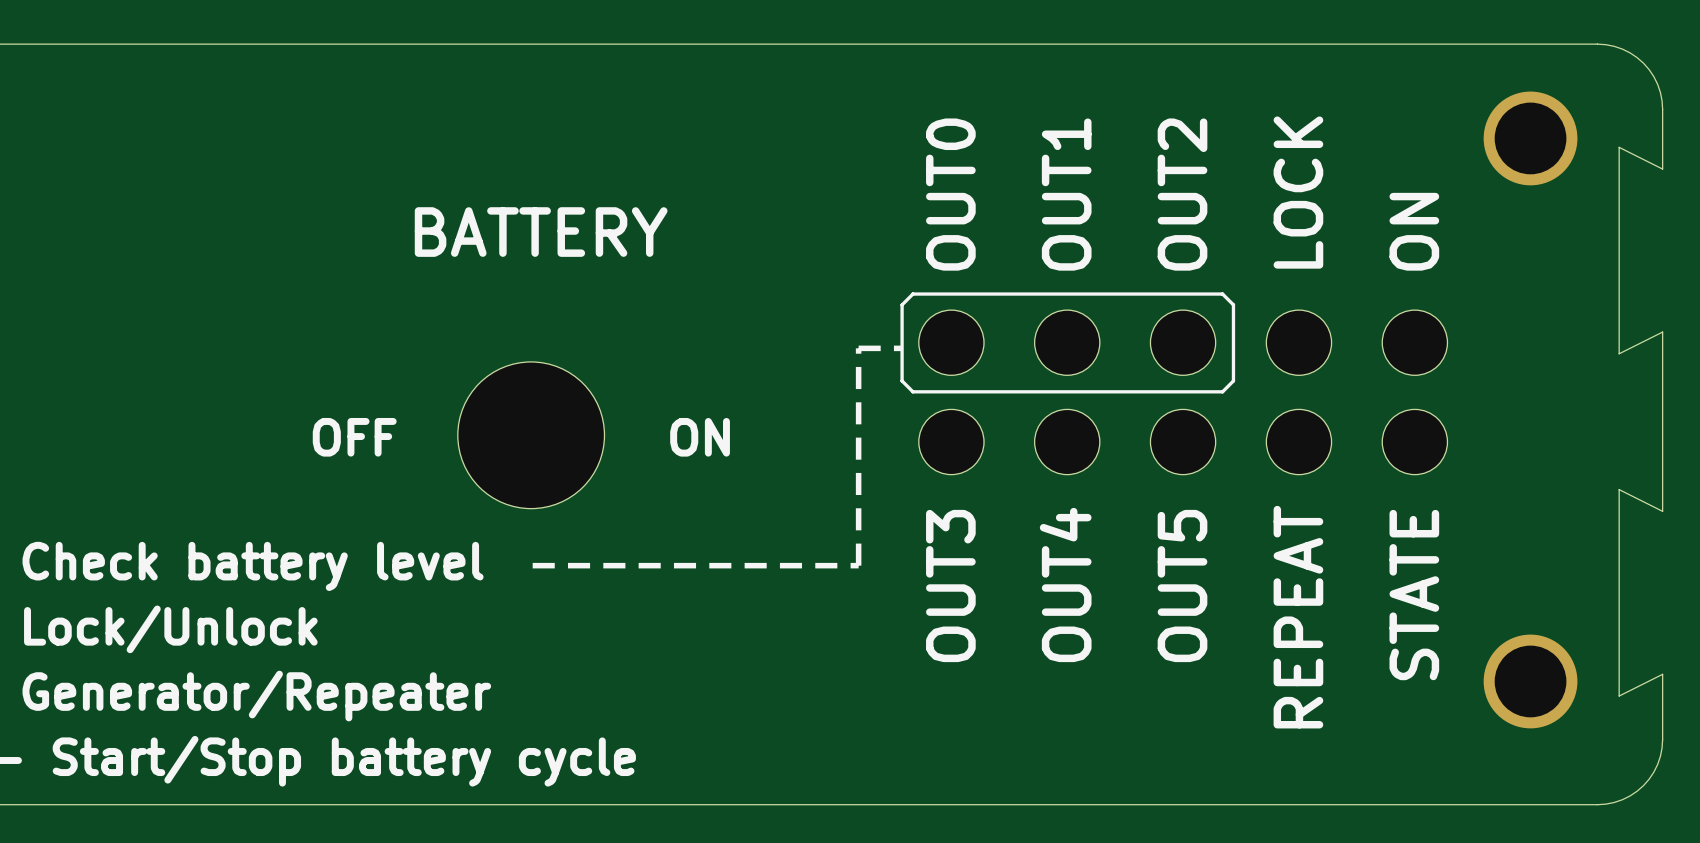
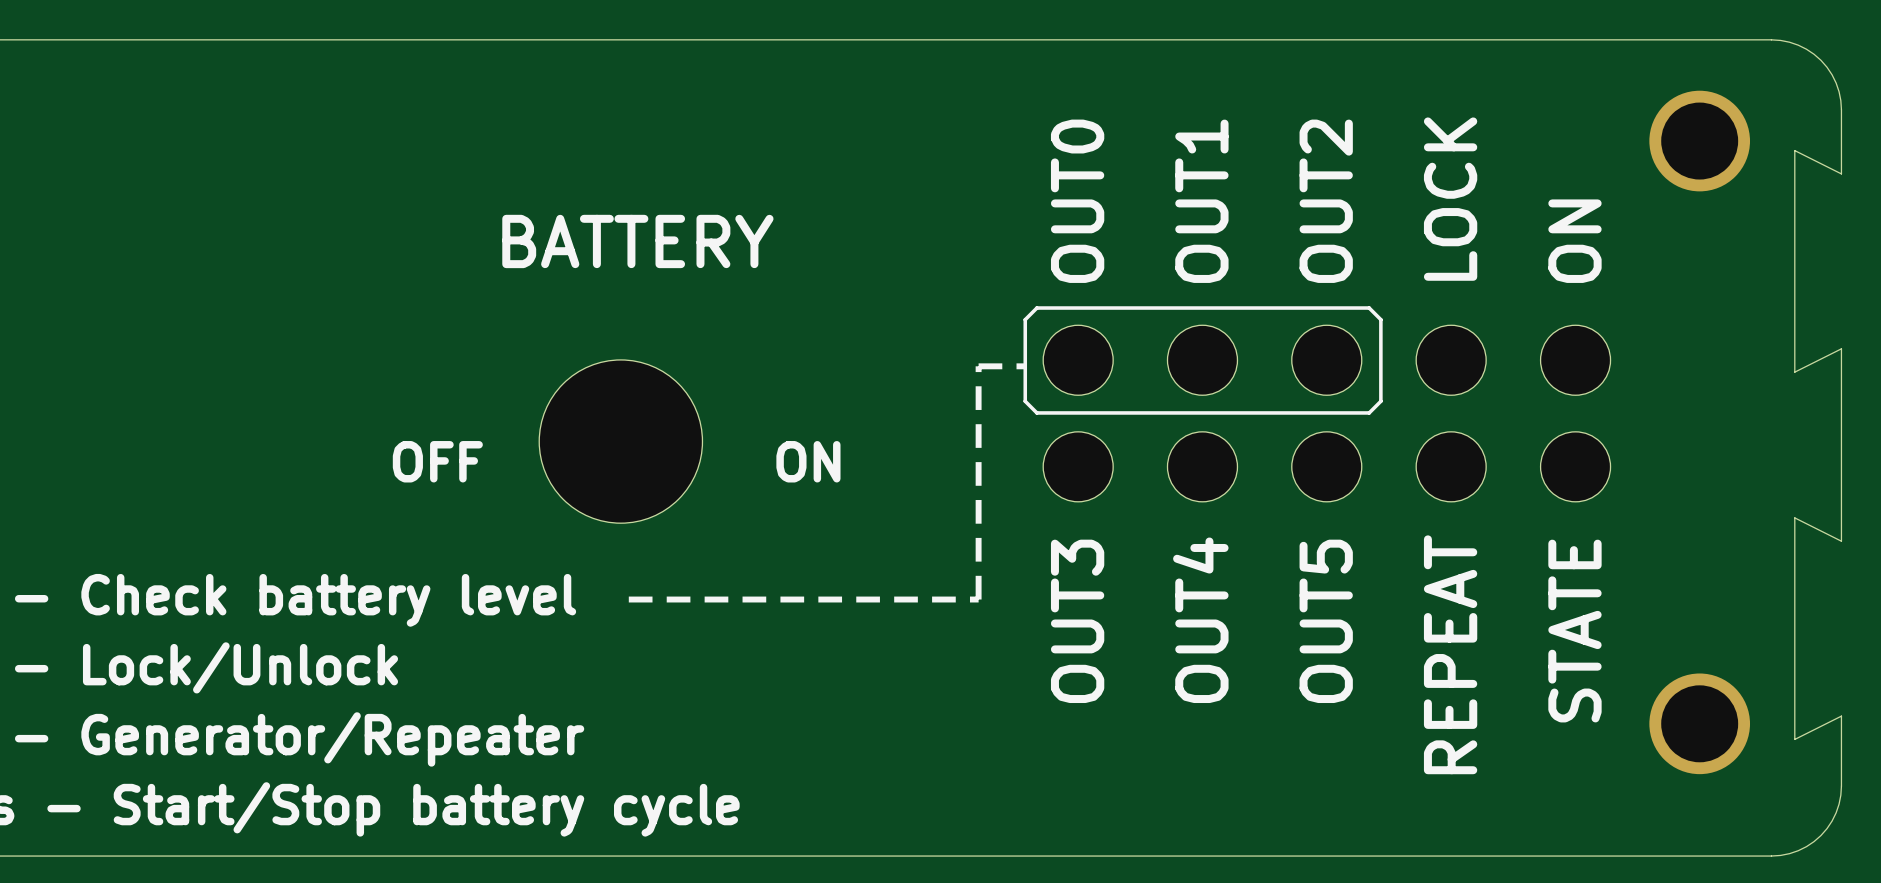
part footprint: [457, 361, 605, 509] -> [539, 359, 703, 524]

